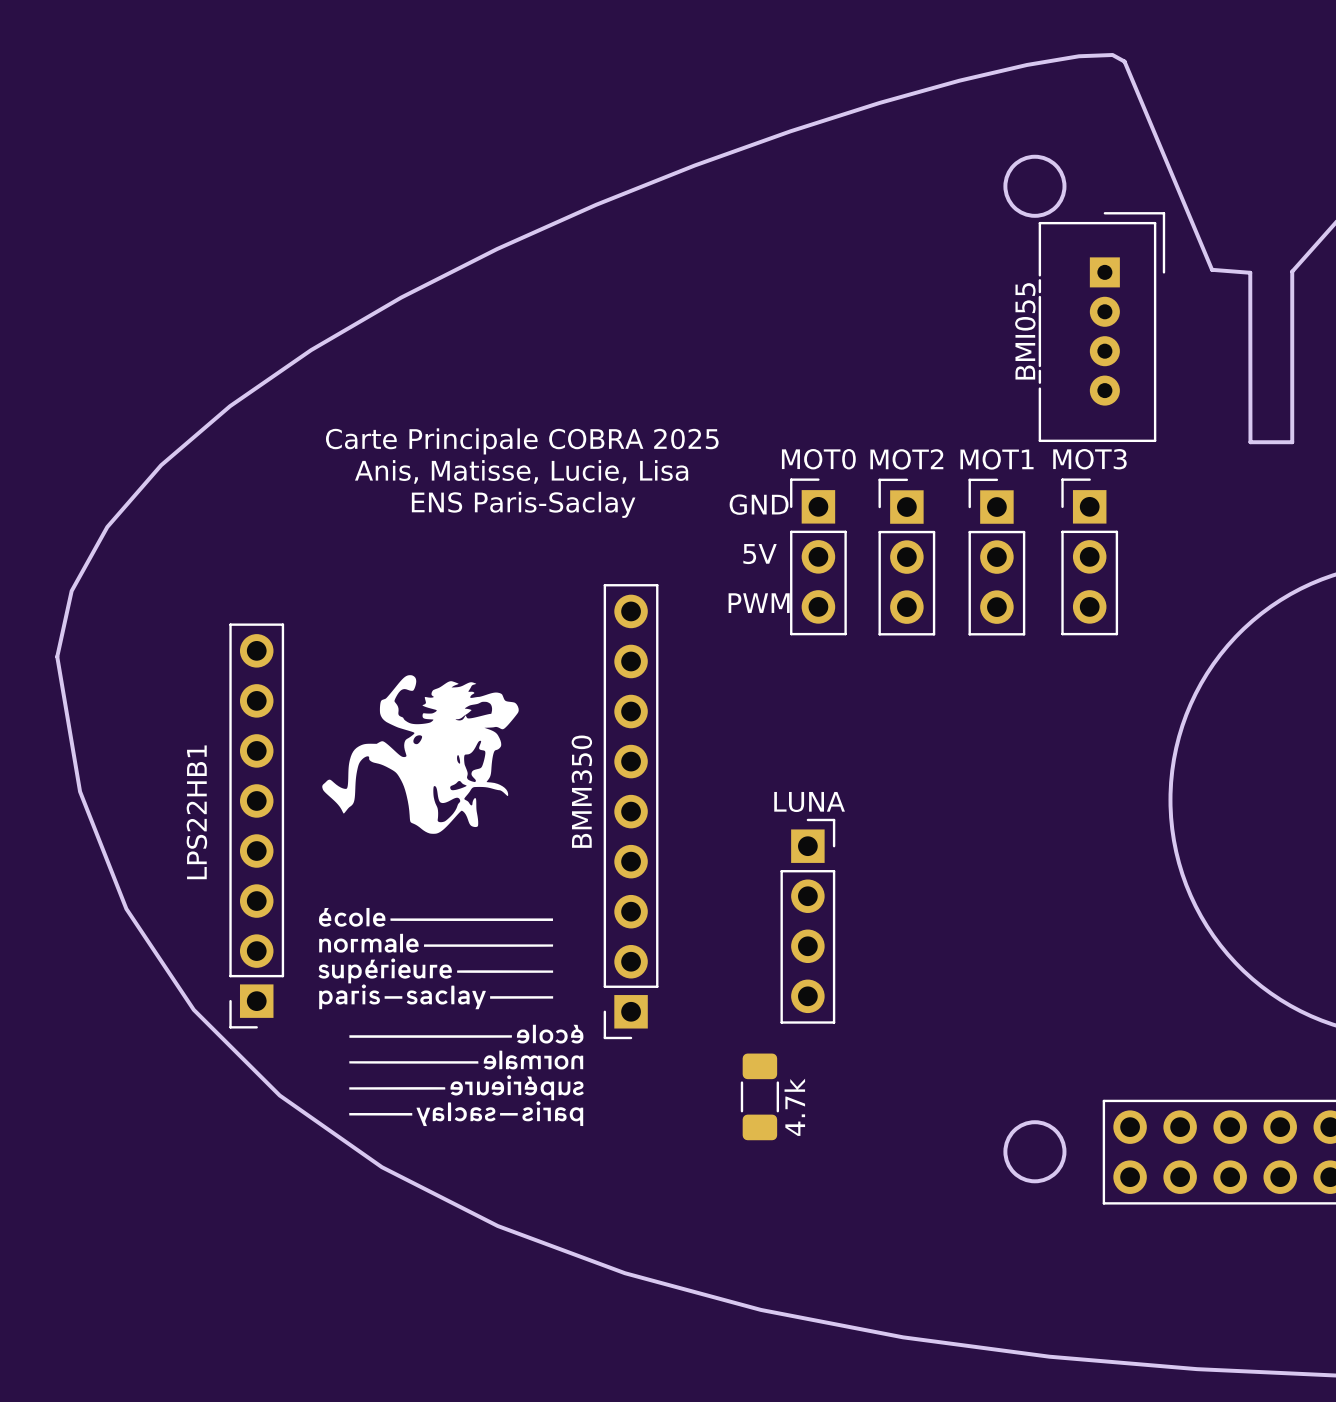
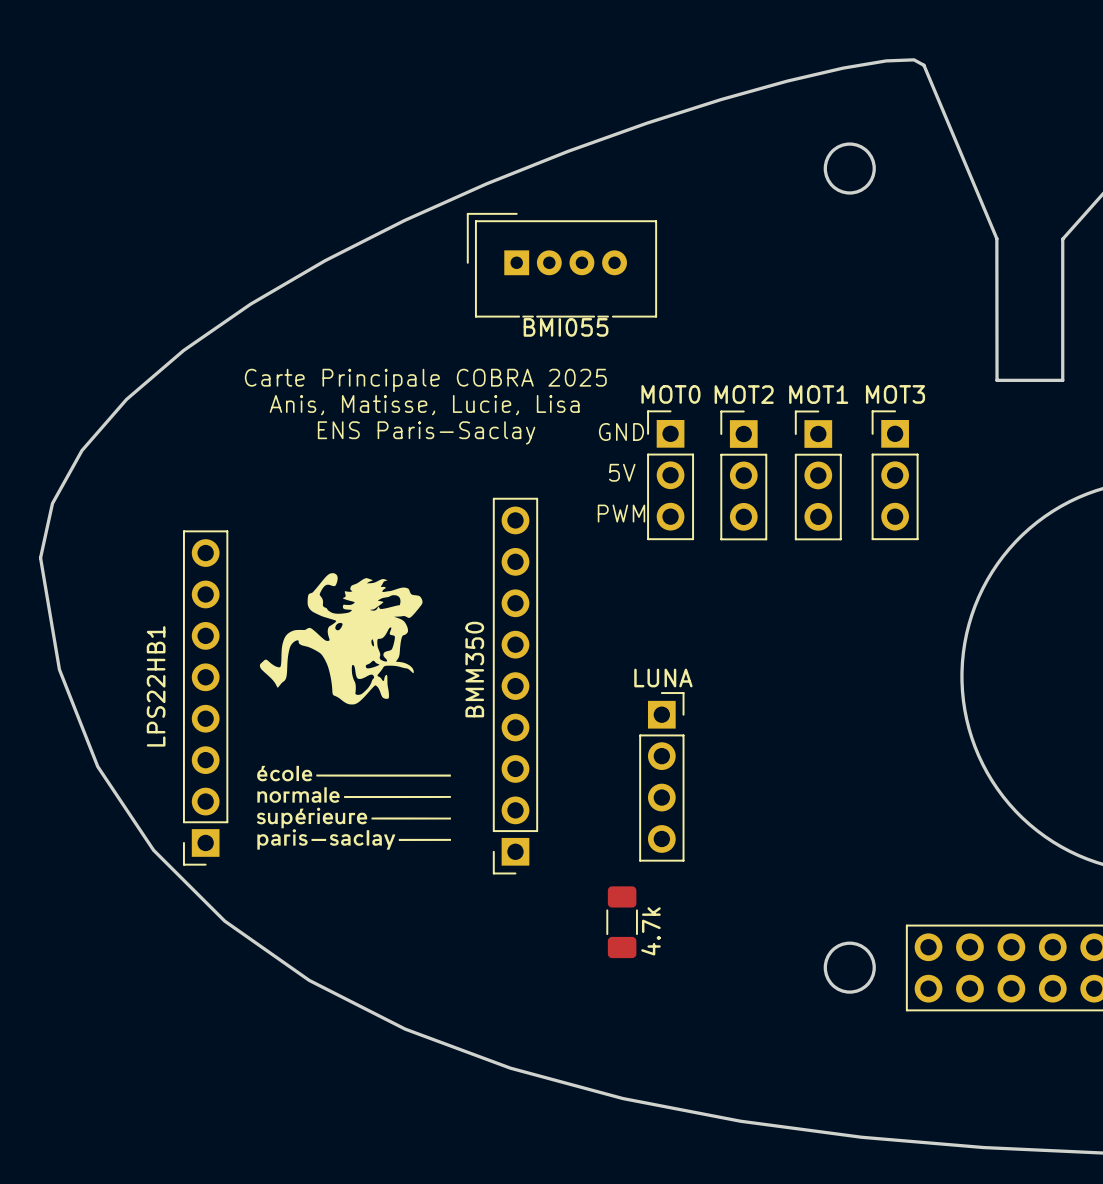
board edge: (1124, 61) (1212, 269) (1250, 272) (1250, 442) -> (923, 65) (996, 238) (997, 380) (1028, 380)
BMI055 rotation: 0° (1101, 327) -> 90° counterclockwise (561, 265)
BMI055 position: (1101, 327) -> (561, 265)
drawing: [349, 1024, 584, 1127] -> none

